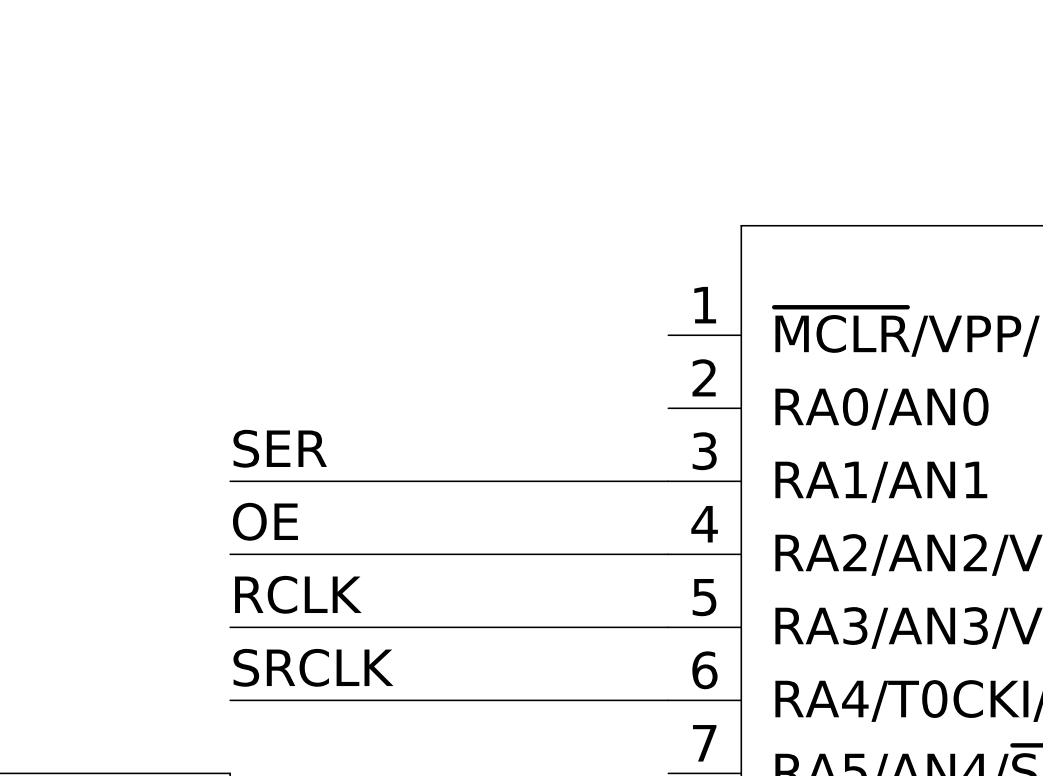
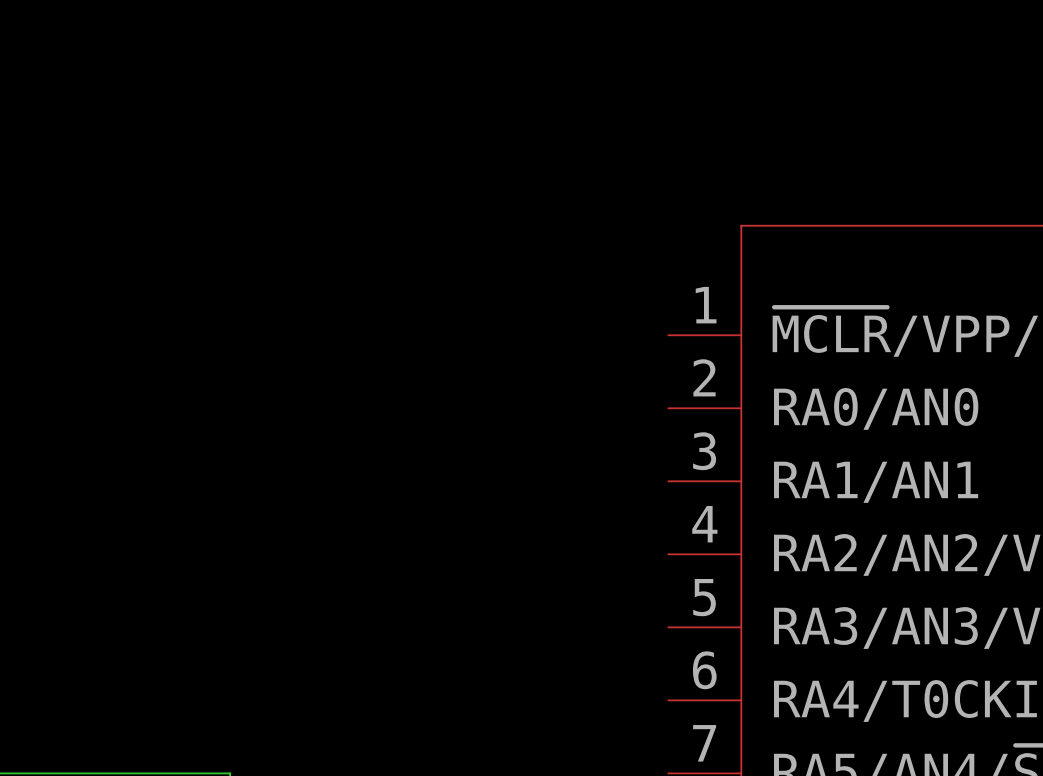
label: SER (280, 448) -> none
wire: (230, 481) (668, 481) -> none
label: OE (265, 521) -> none
wire: (230, 554) (668, 554) -> none
label: RCLK (298, 594) -> none
wire: (230, 627) (668, 627) -> none
label: SRCLK (313, 667) -> none
wire: (230, 700) (668, 700) -> none

